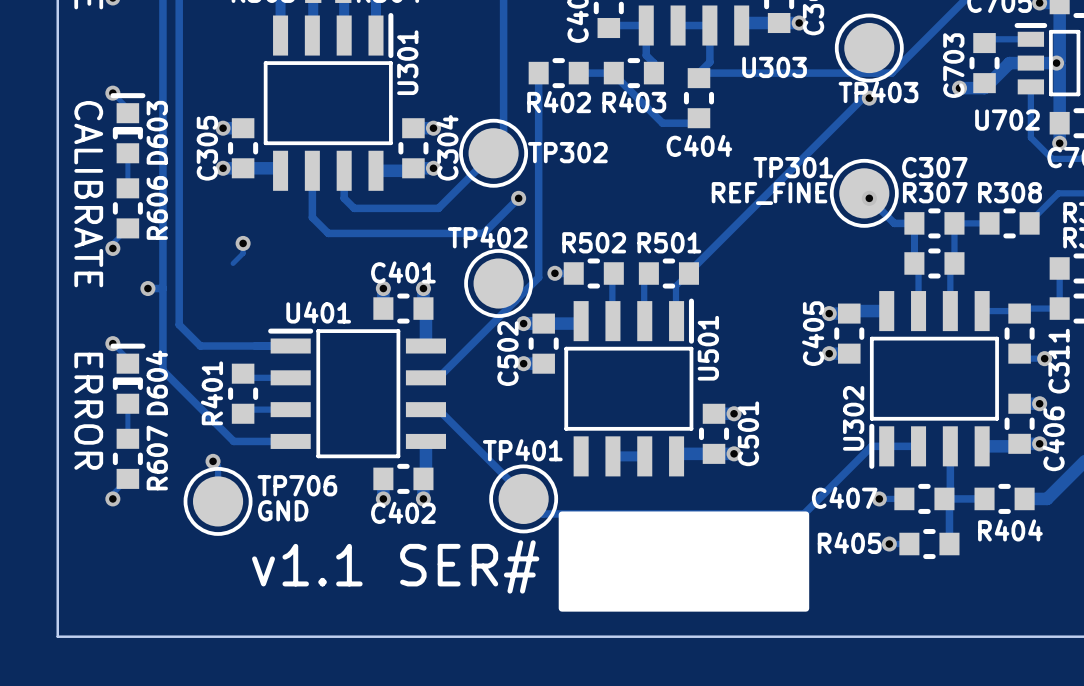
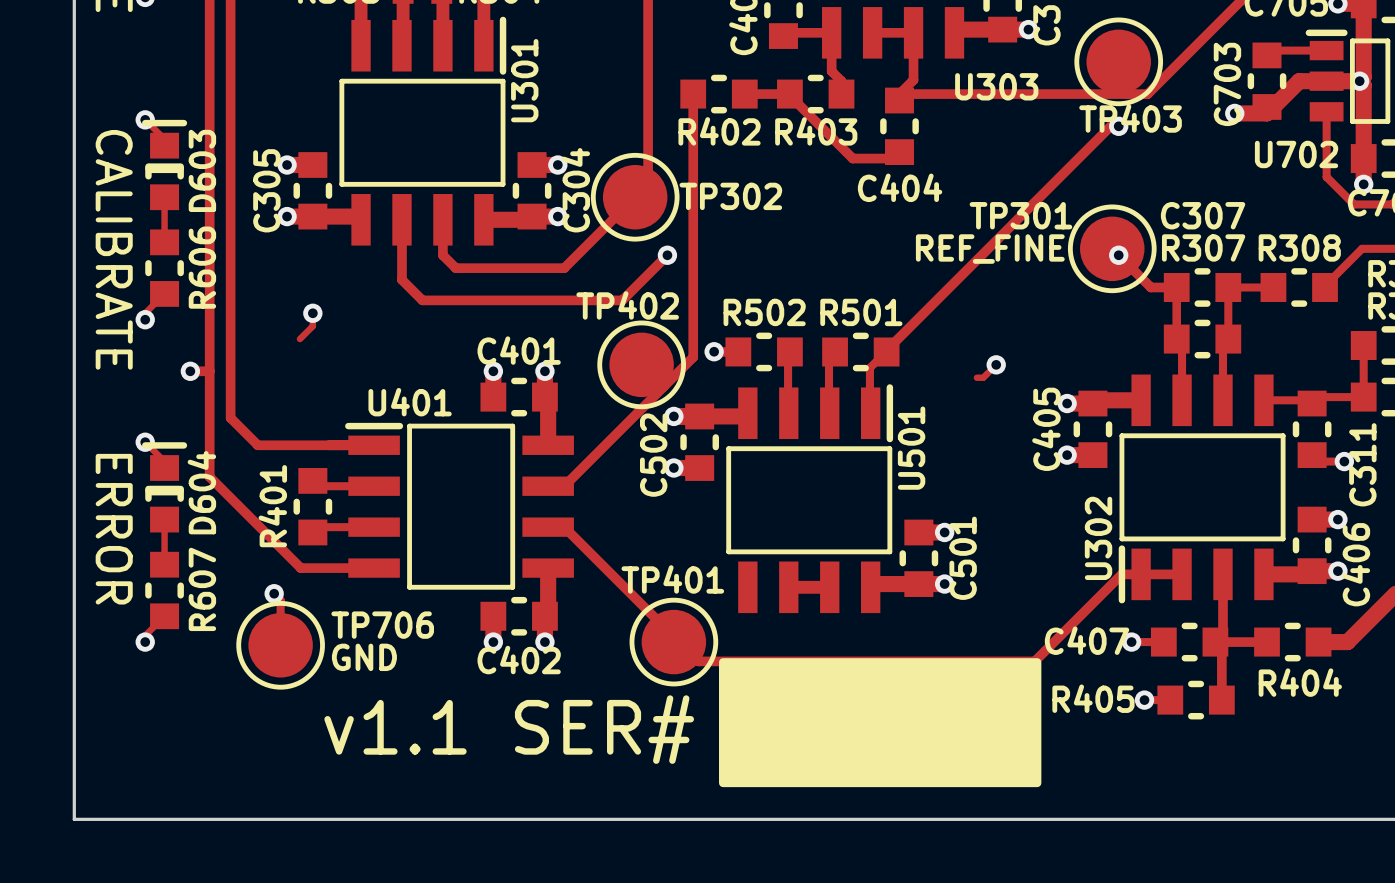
track: none -> (996, 364) (983, 377) (976, 377)
via: none -> (996, 364)

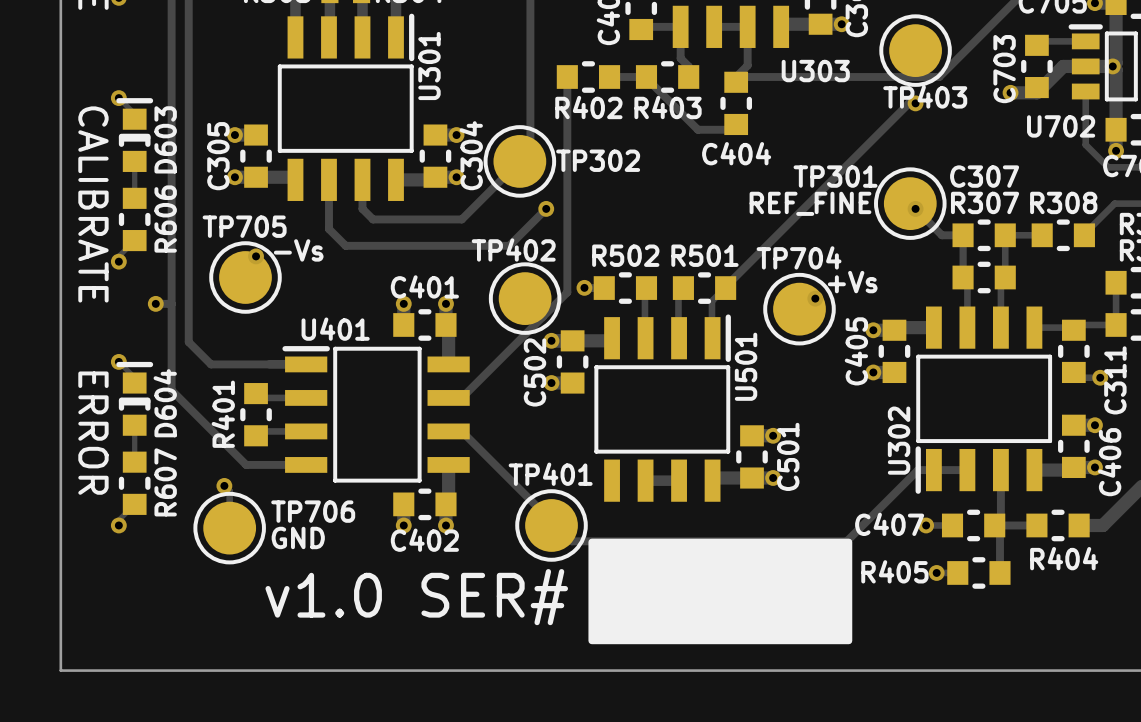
TP705: none -> -Vs (245, 277)
TP704: none -> +Vs (799, 309)
text: v1.1 (395, 727) -> v1.0 (323, 595)

